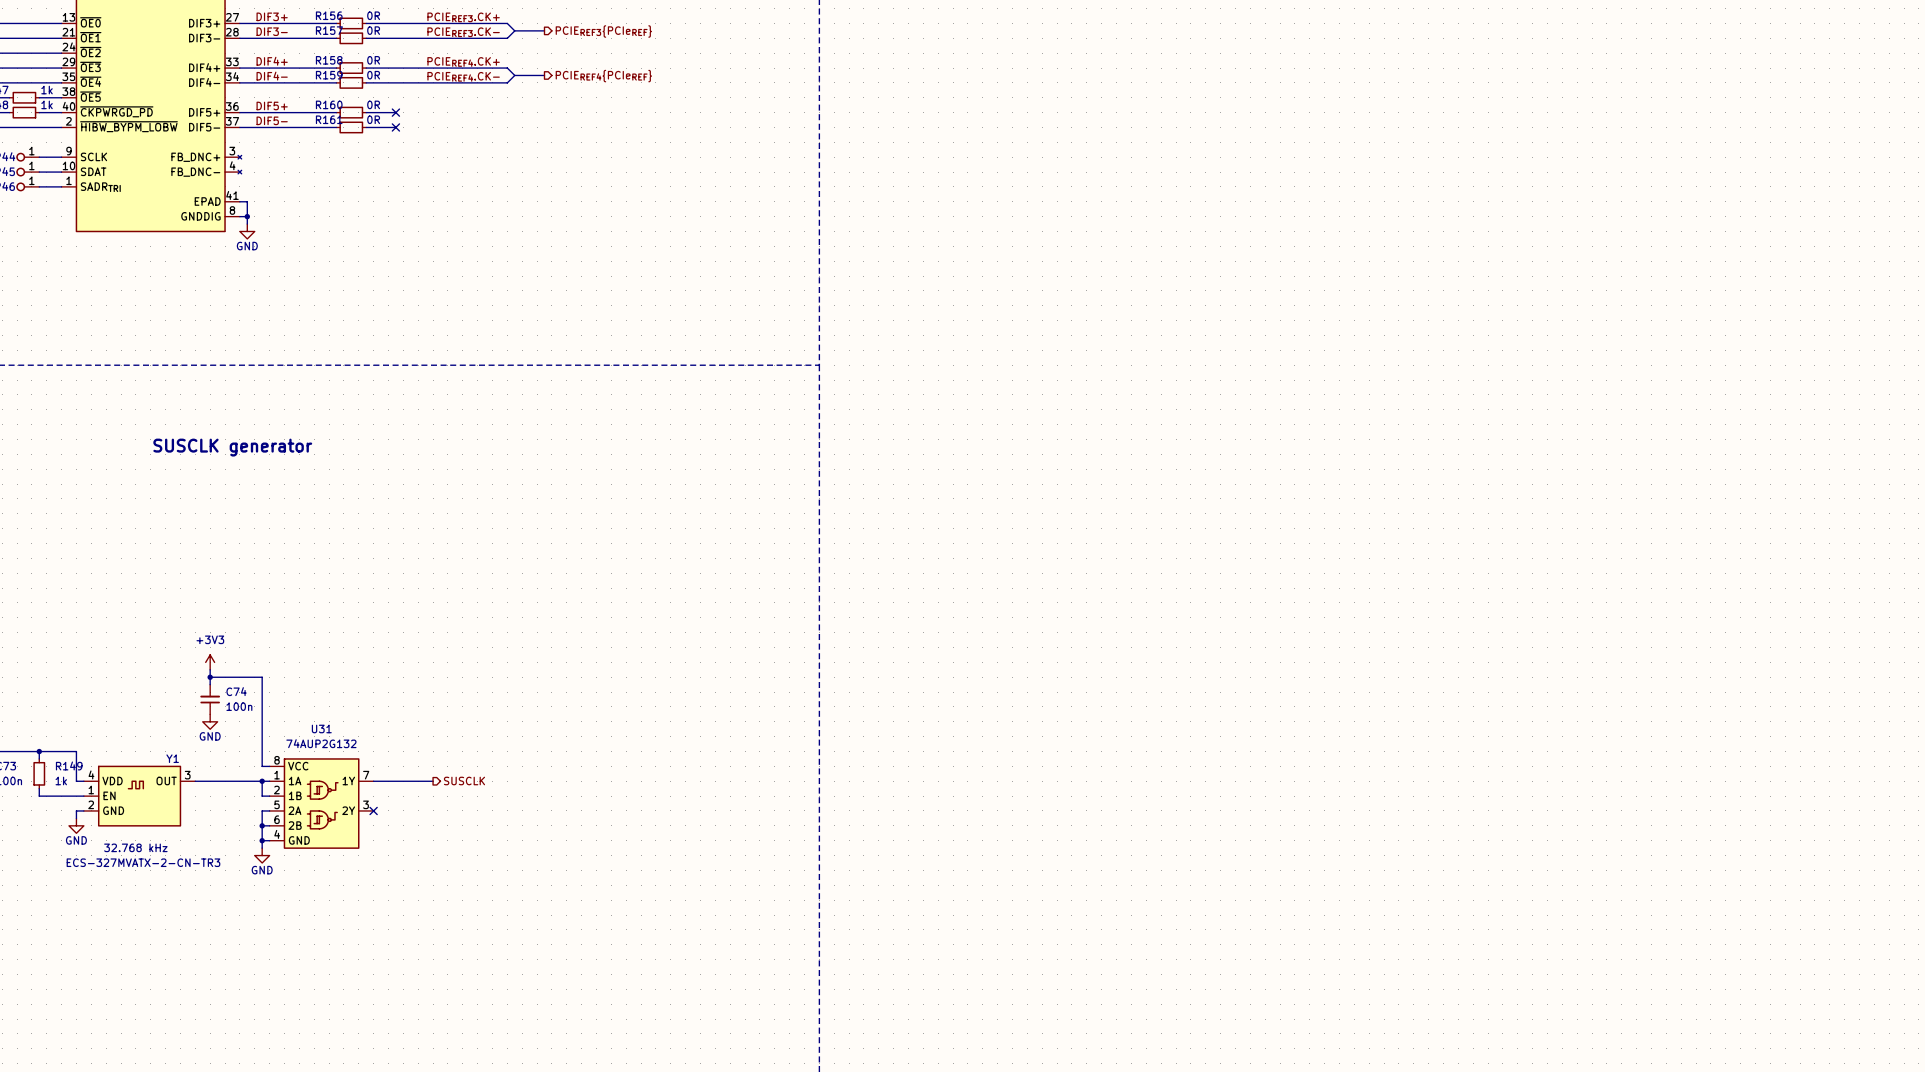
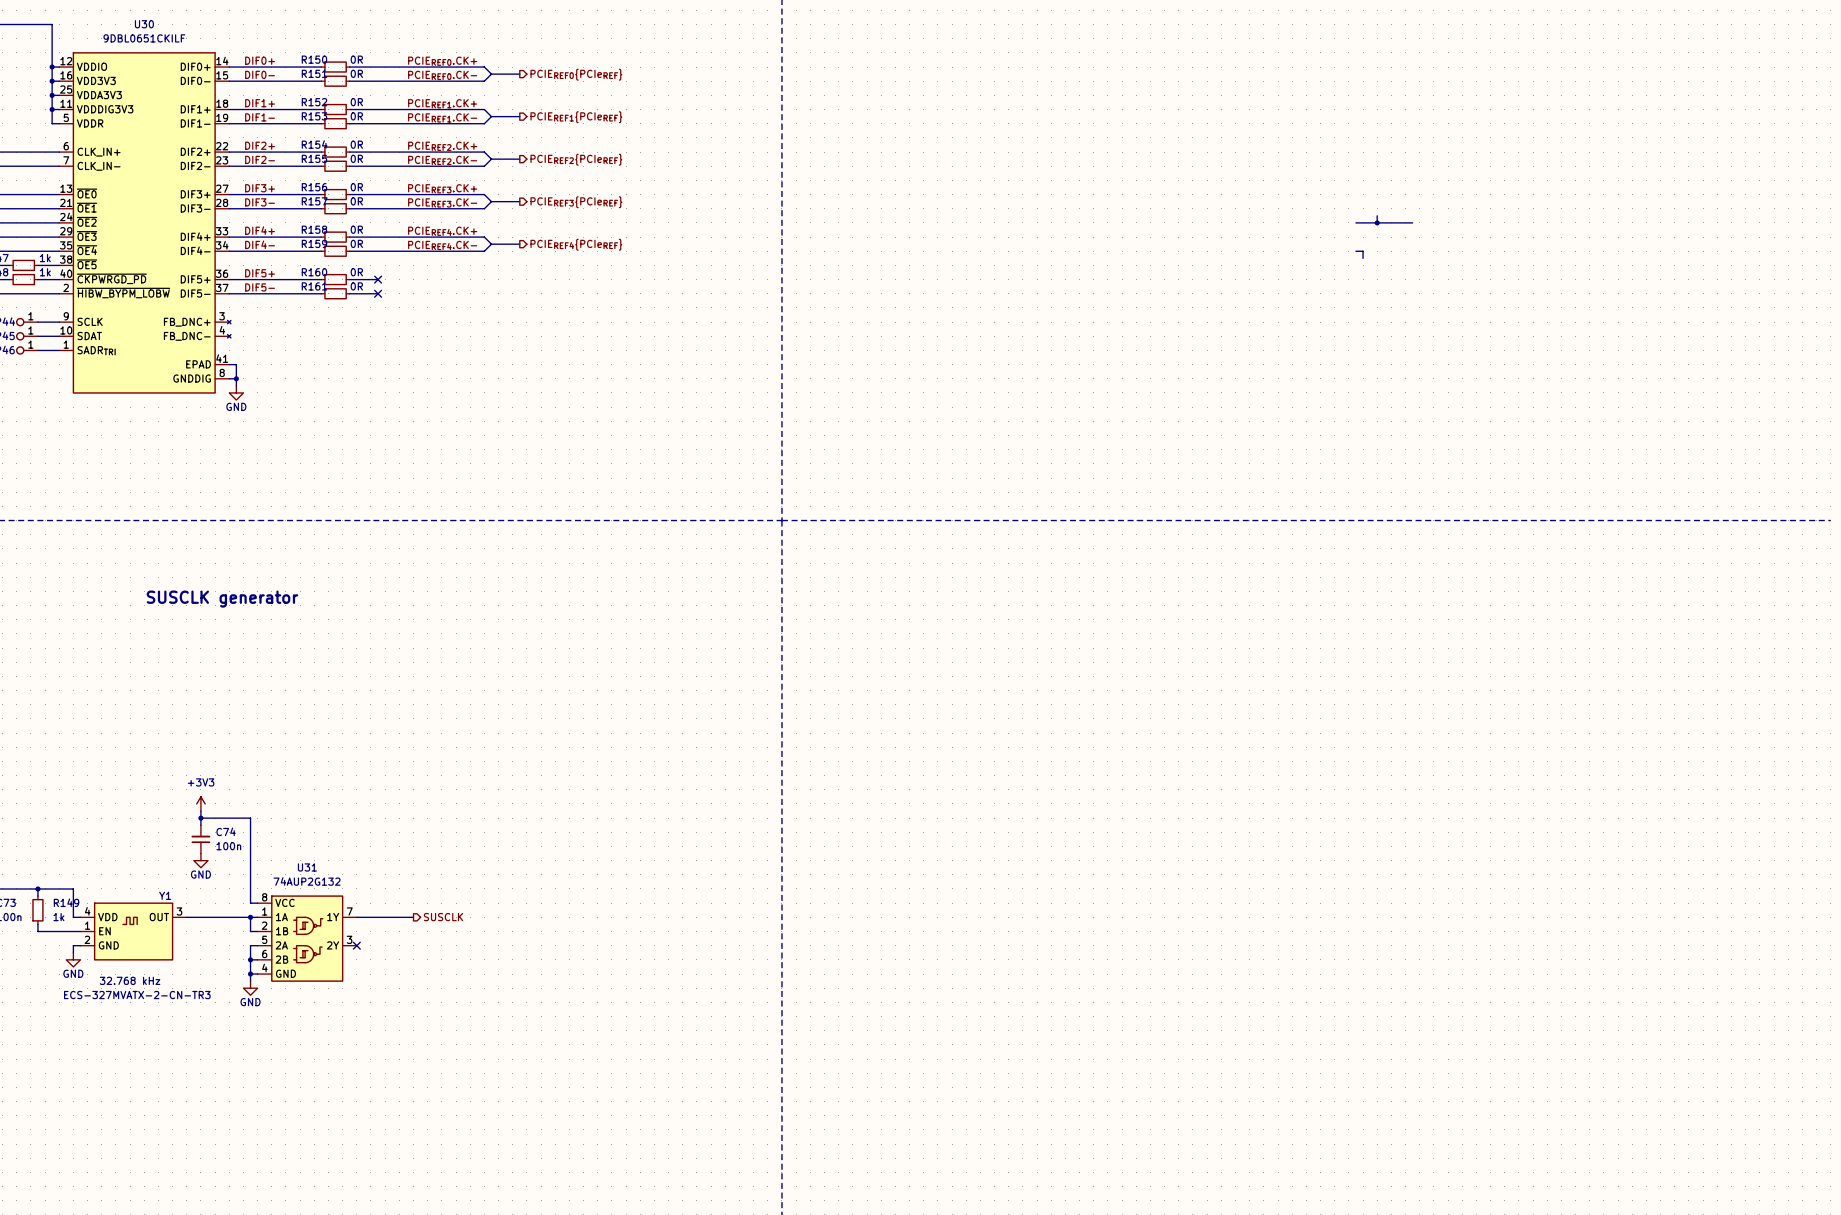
wire: none -> (1377, 215) (1377, 222)
wire: none -> (1355, 222) (1412, 222)
junction: none -> (1377, 222)
wire: none -> (1355, 251) (1363, 251) (1363, 258)
line: none -> (781, 520) (1830, 520)

